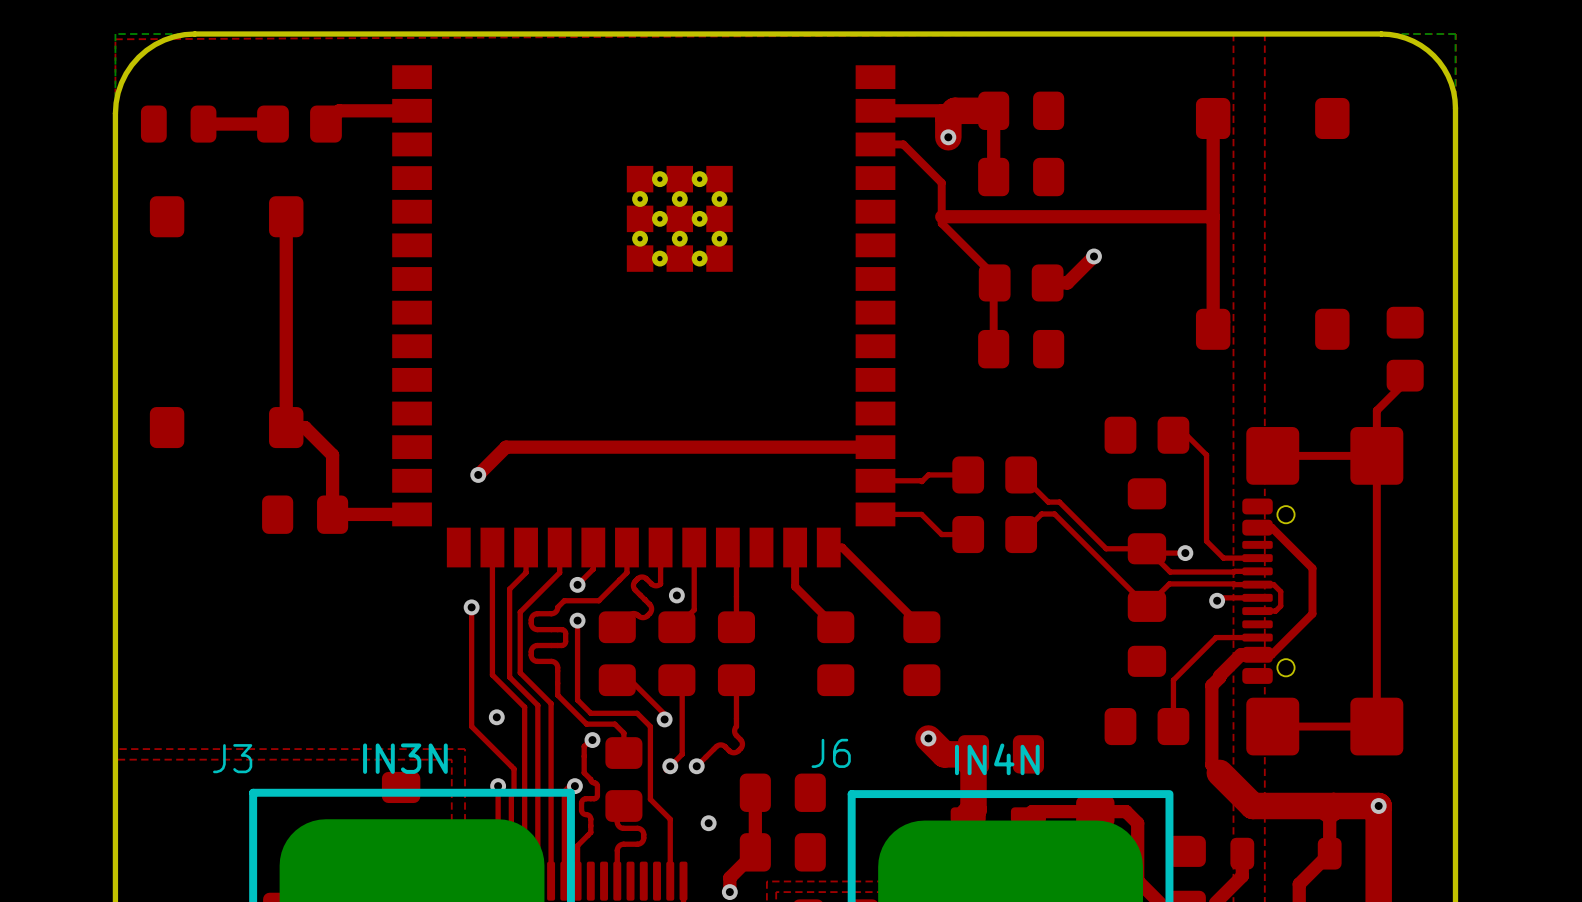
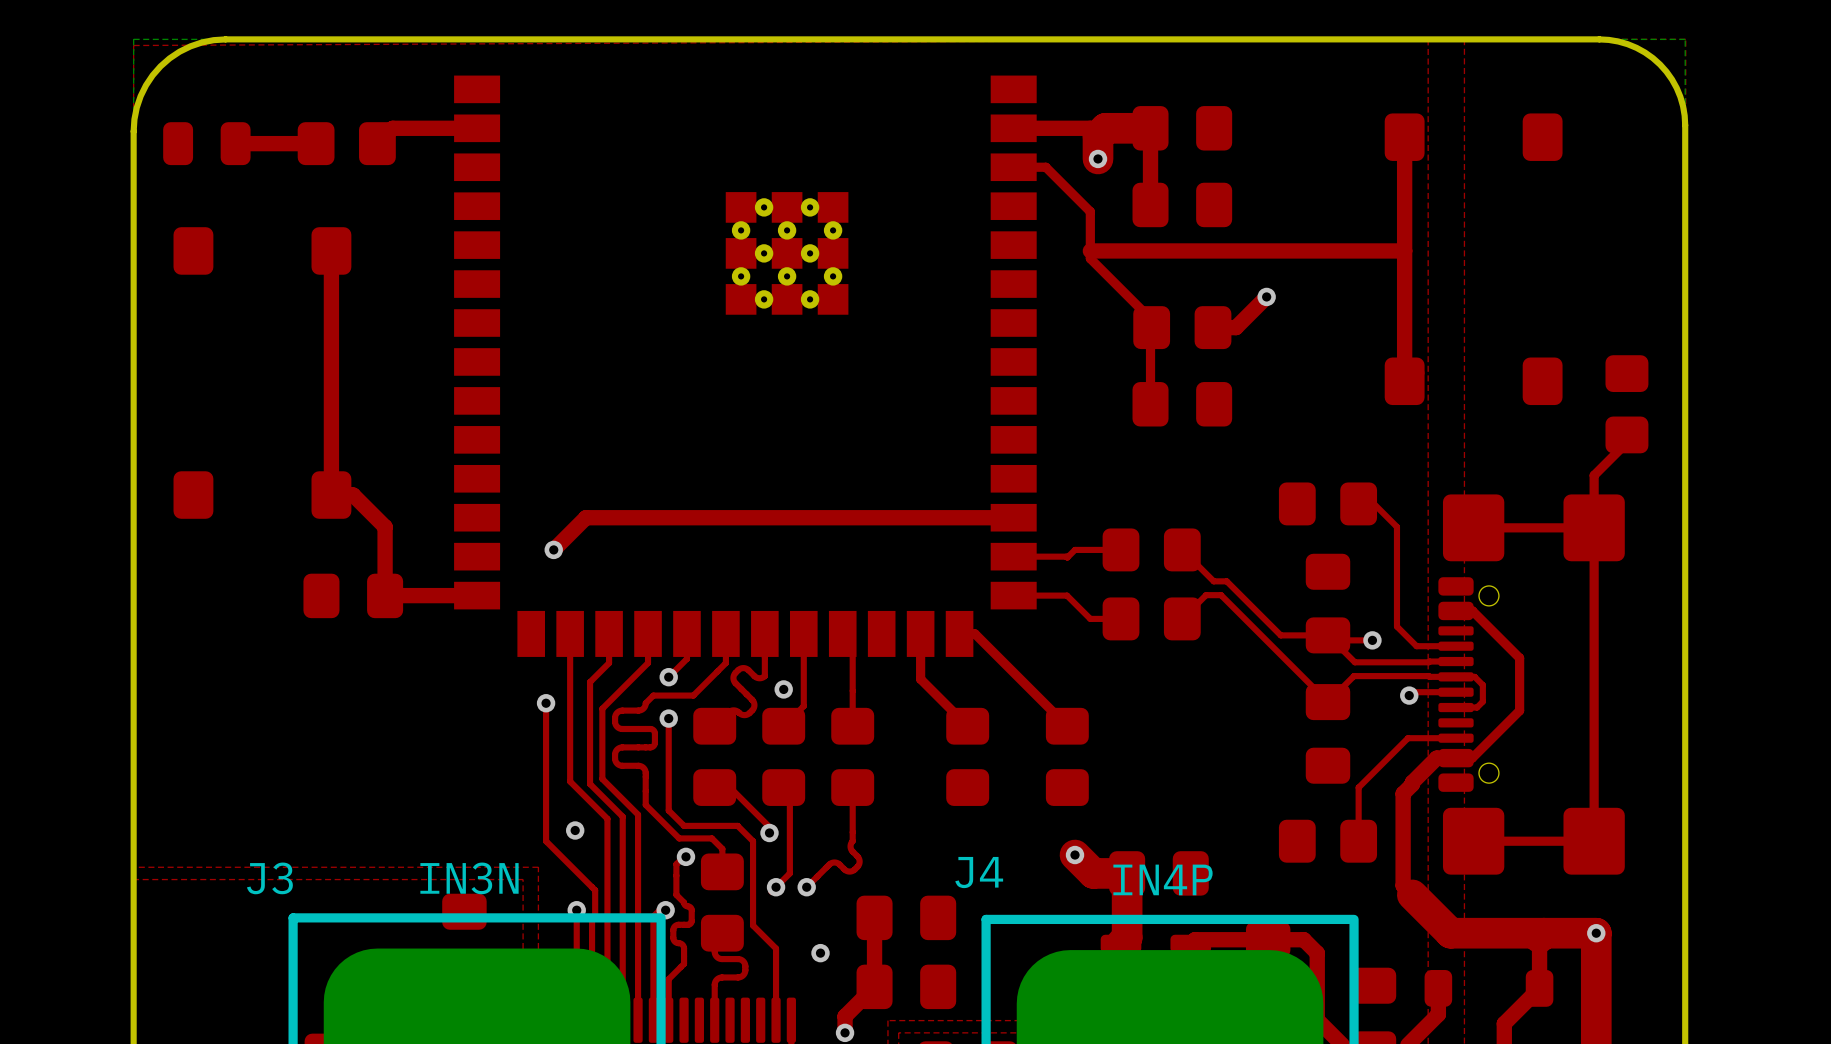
J6 name: J6 (831, 753) -> J4 (979, 872)
J6 value: IN4N (997, 759) -> IN4P (1162, 879)

